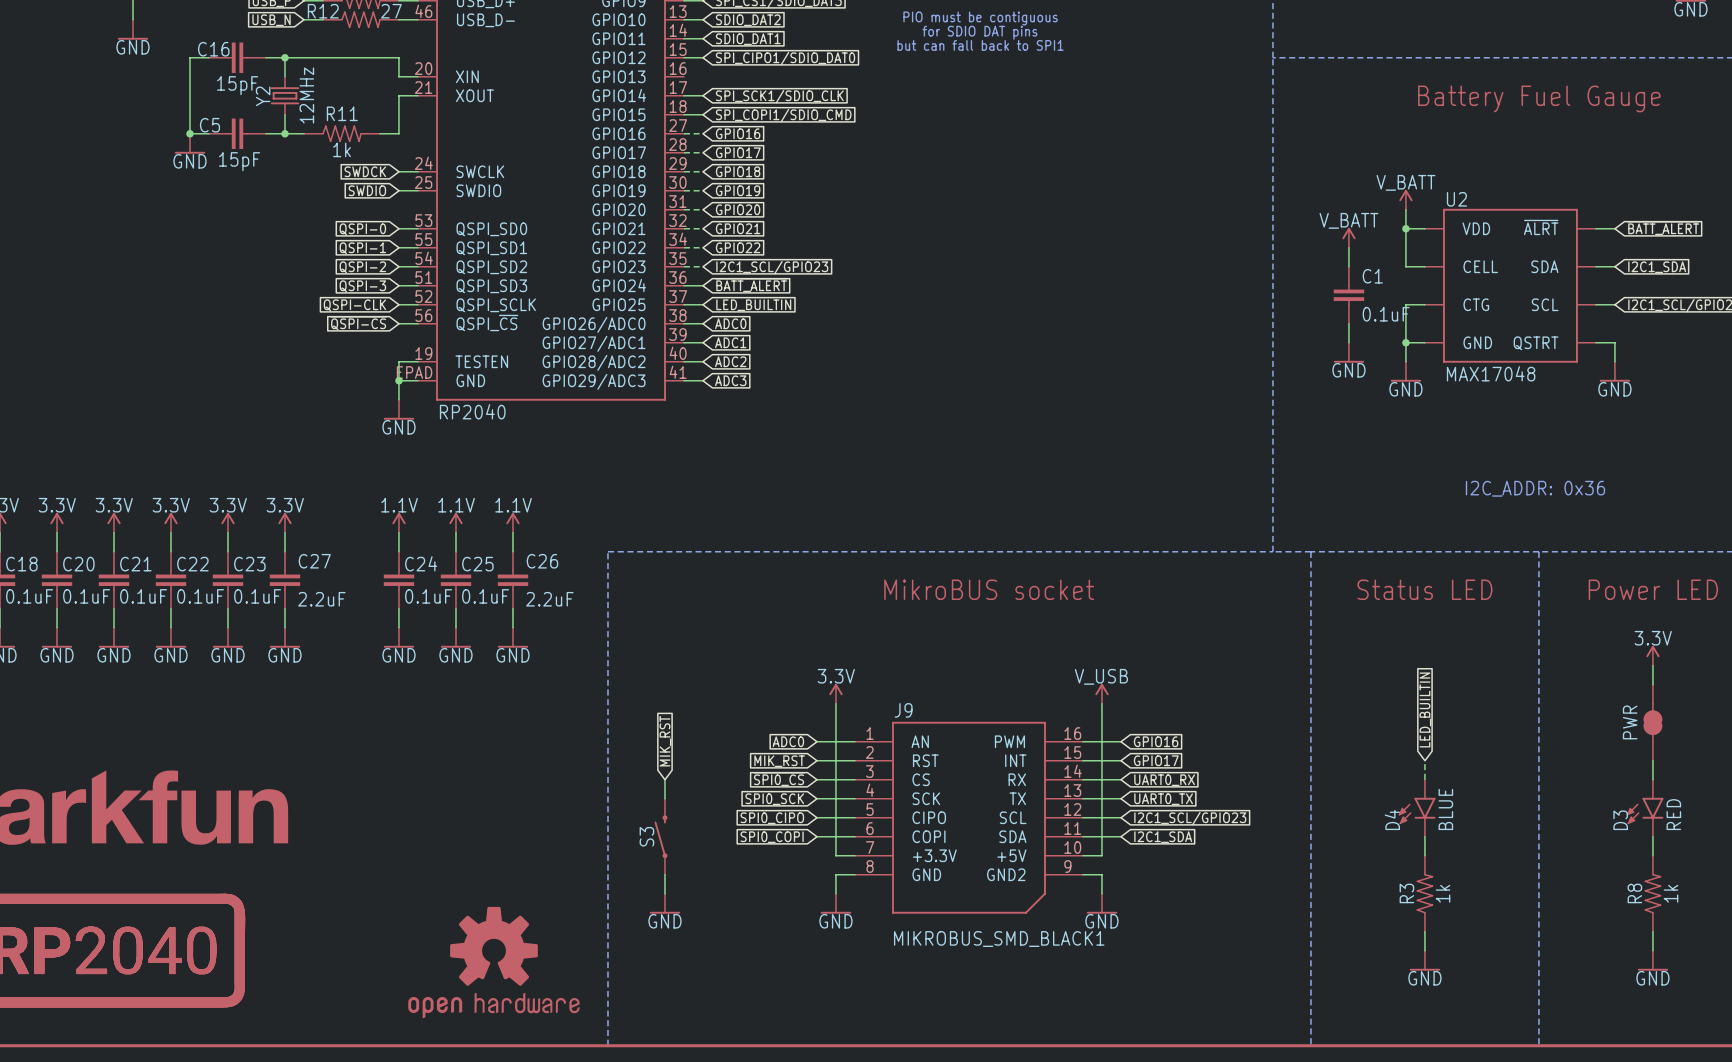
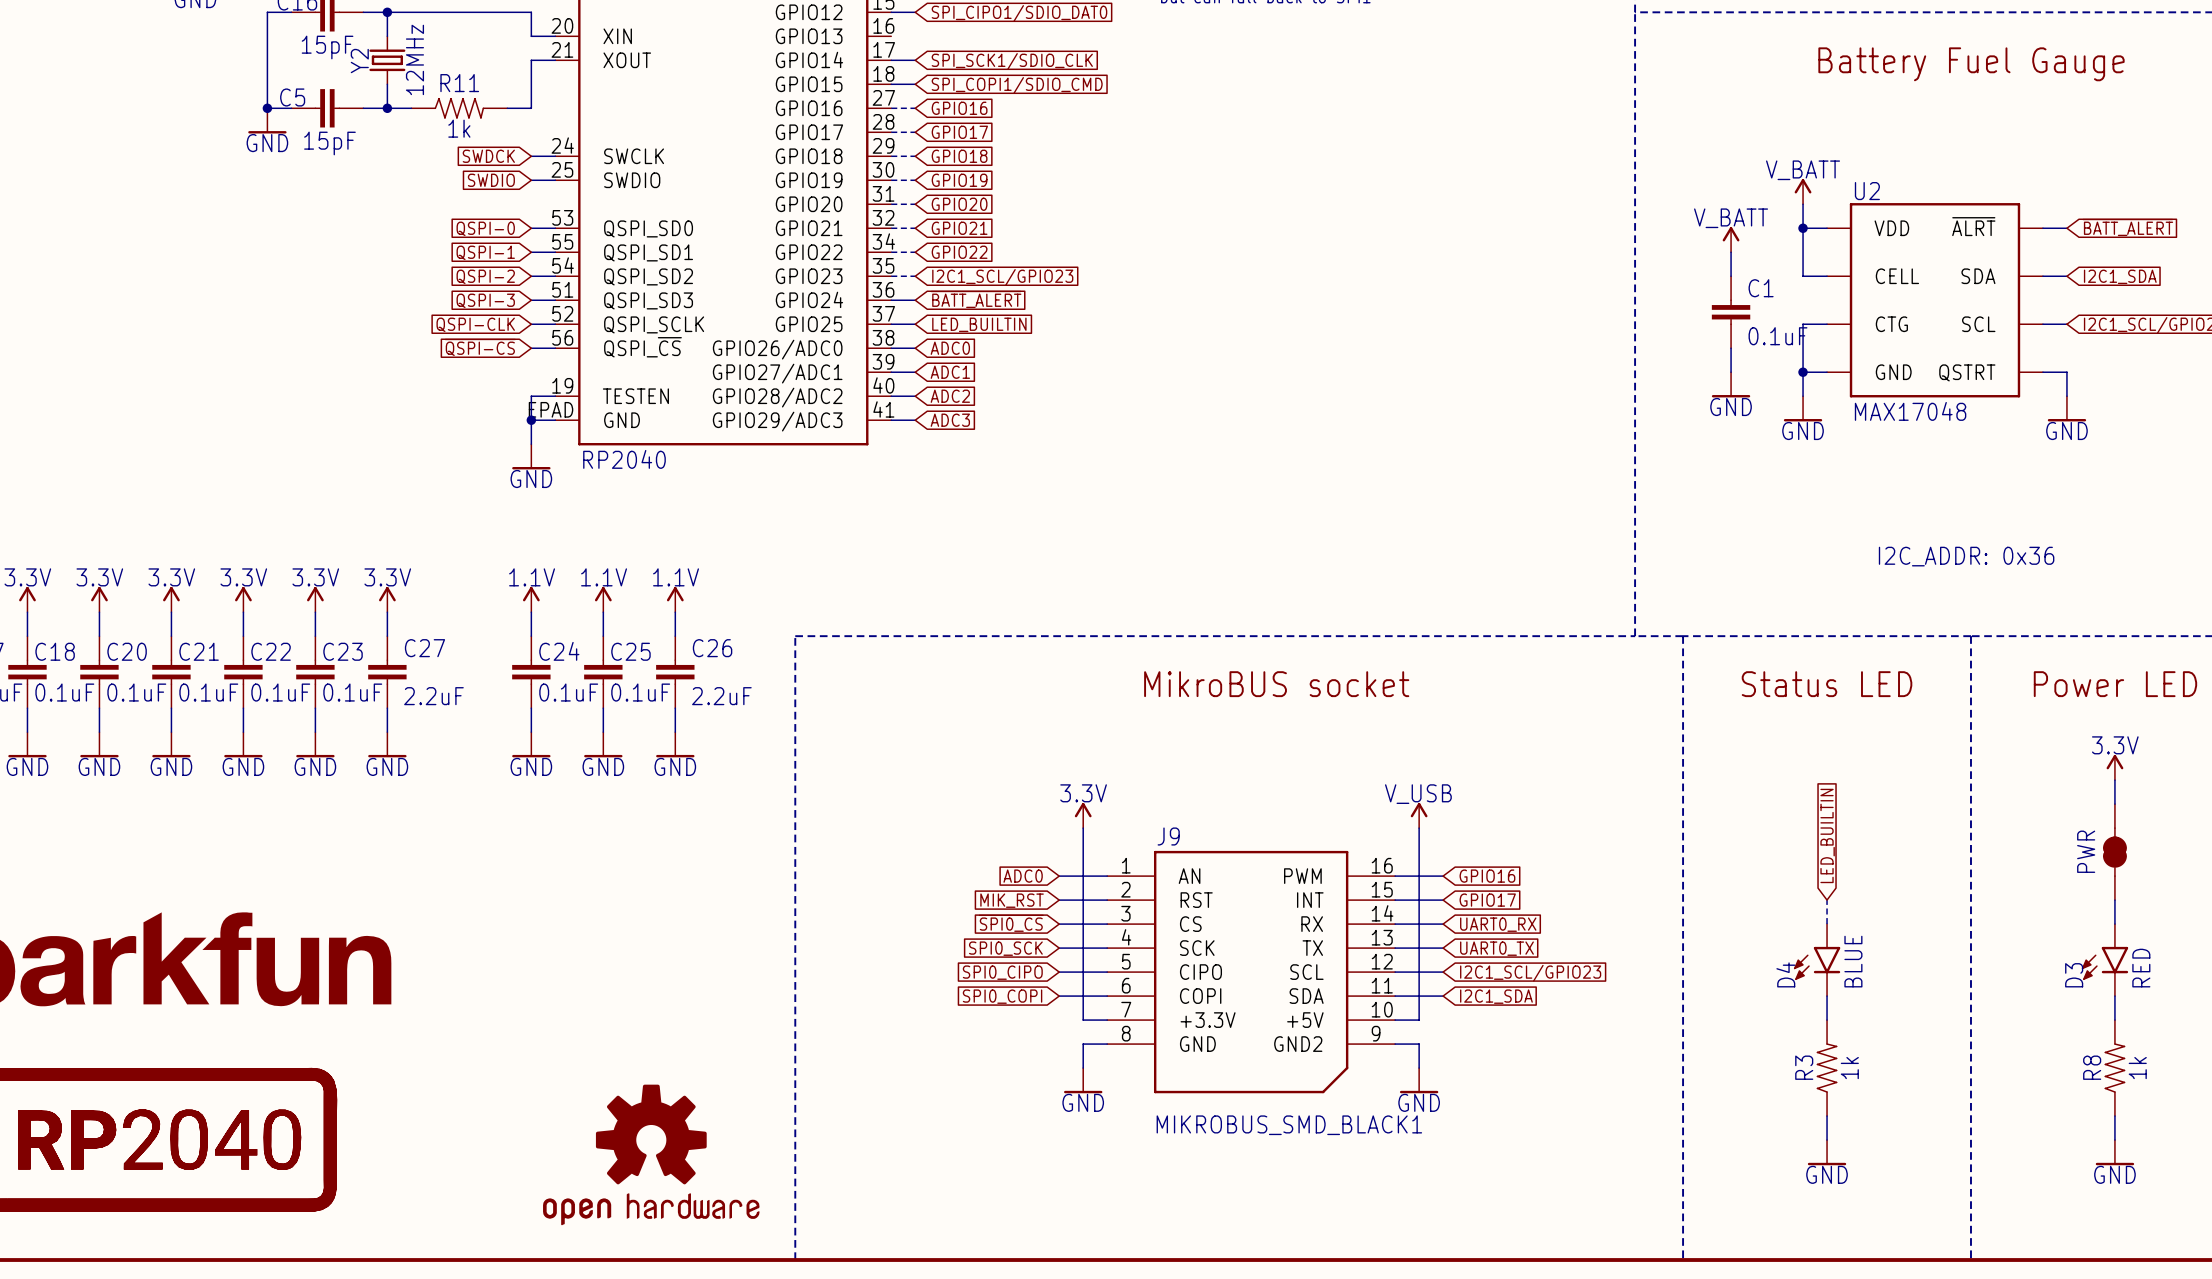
global label: MIK_RST (665, 741) -> none
wire: (664, 779) (664, 798) -> none
S3: (660, 836) -> none
wire: (664, 874) (664, 893) -> none
power symbol: GND (664, 903) -> none

